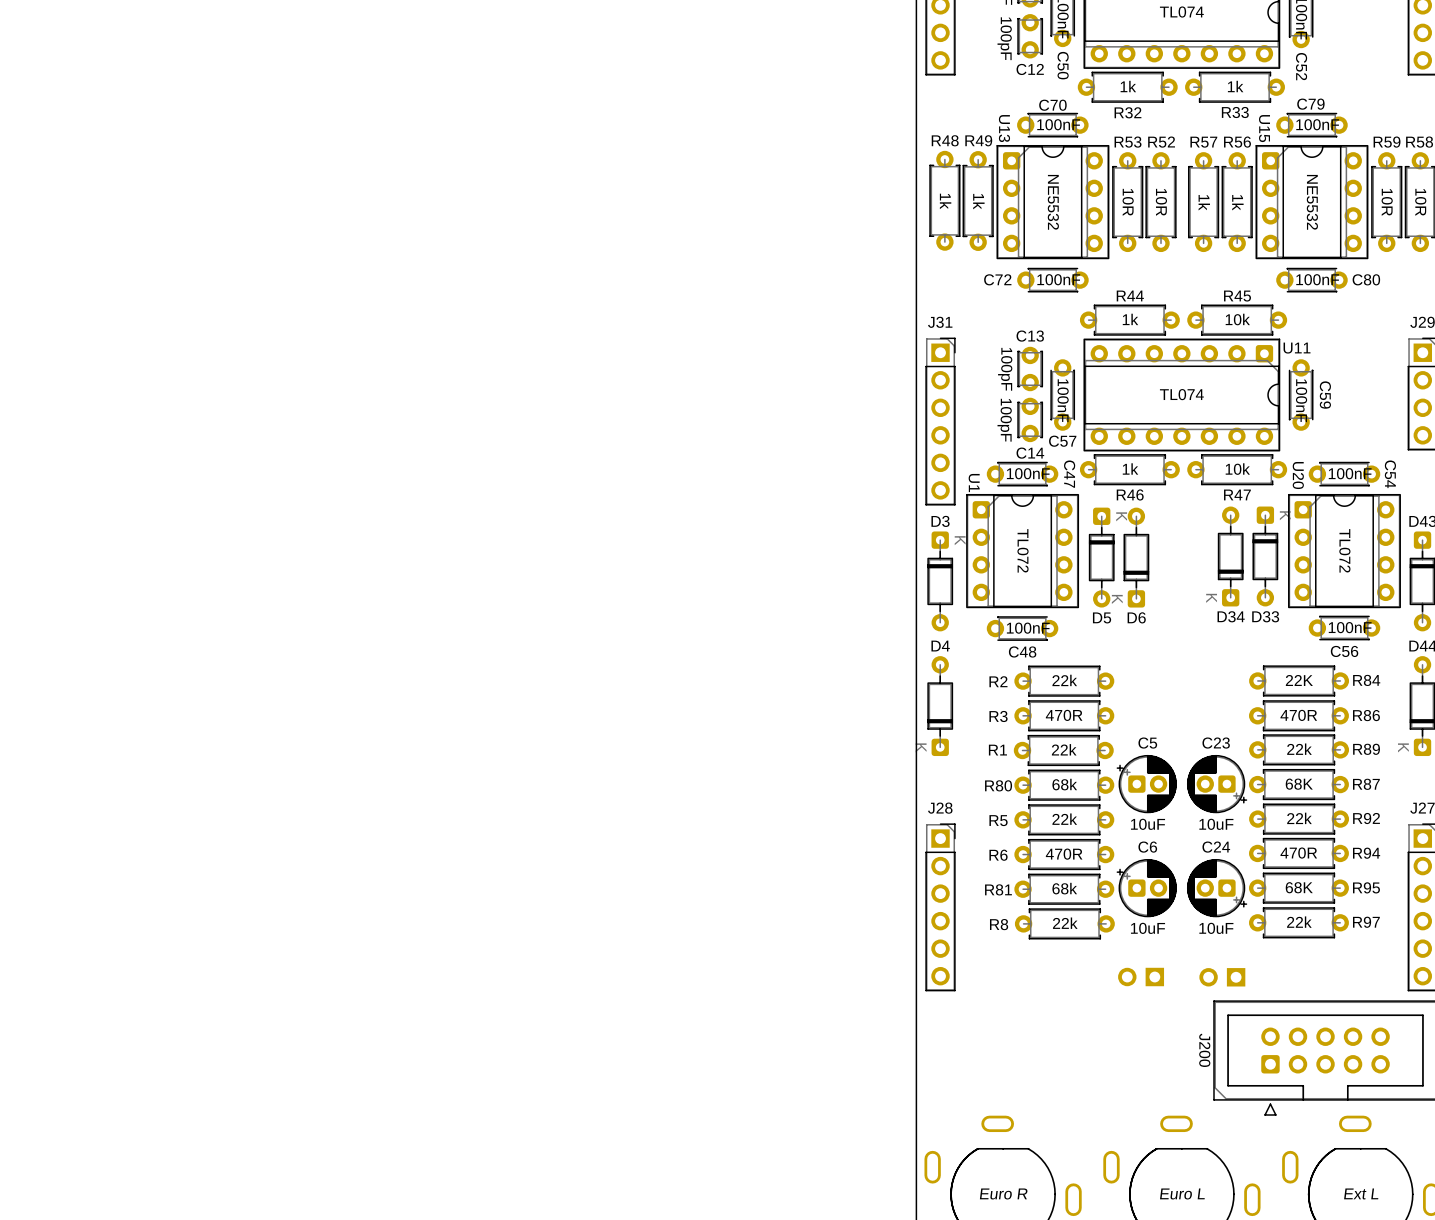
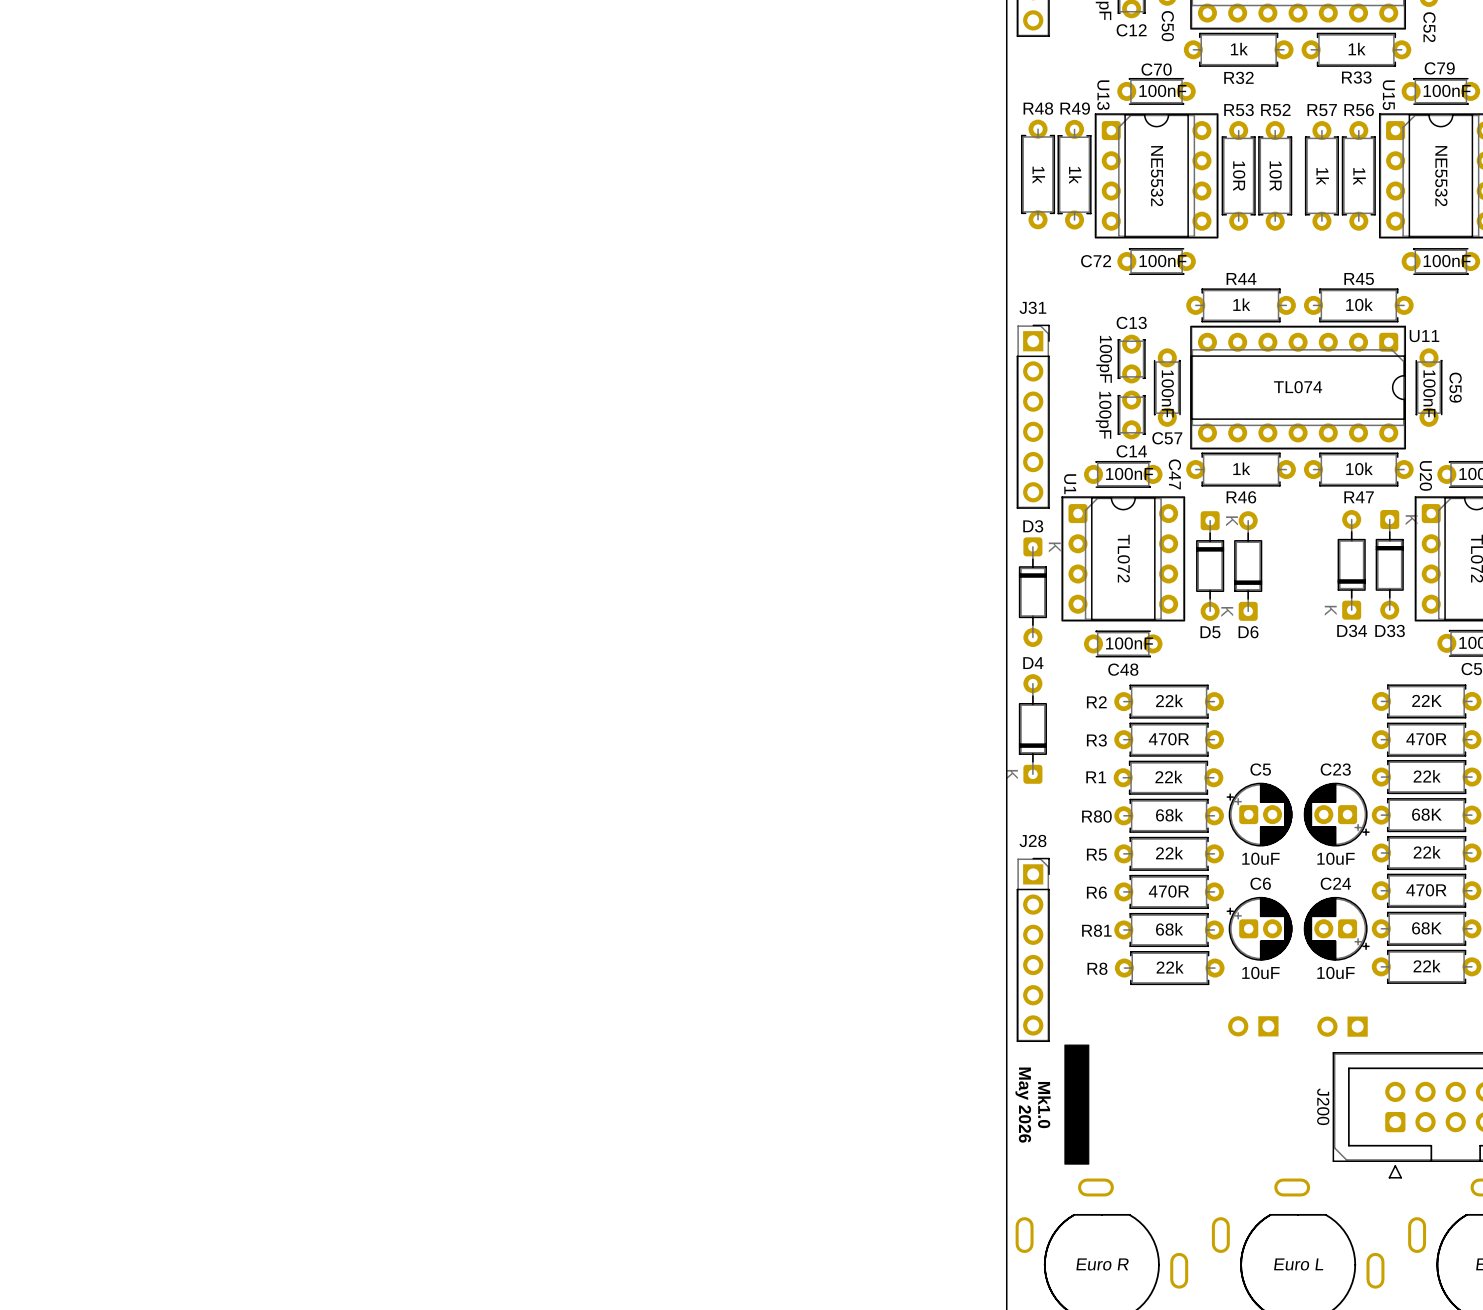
drawing: none -> [1064, 1044, 1090, 1165]
text: none -> May 2026 (1023, 1105)
text: none -> Mk1.0 (1044, 1105)

